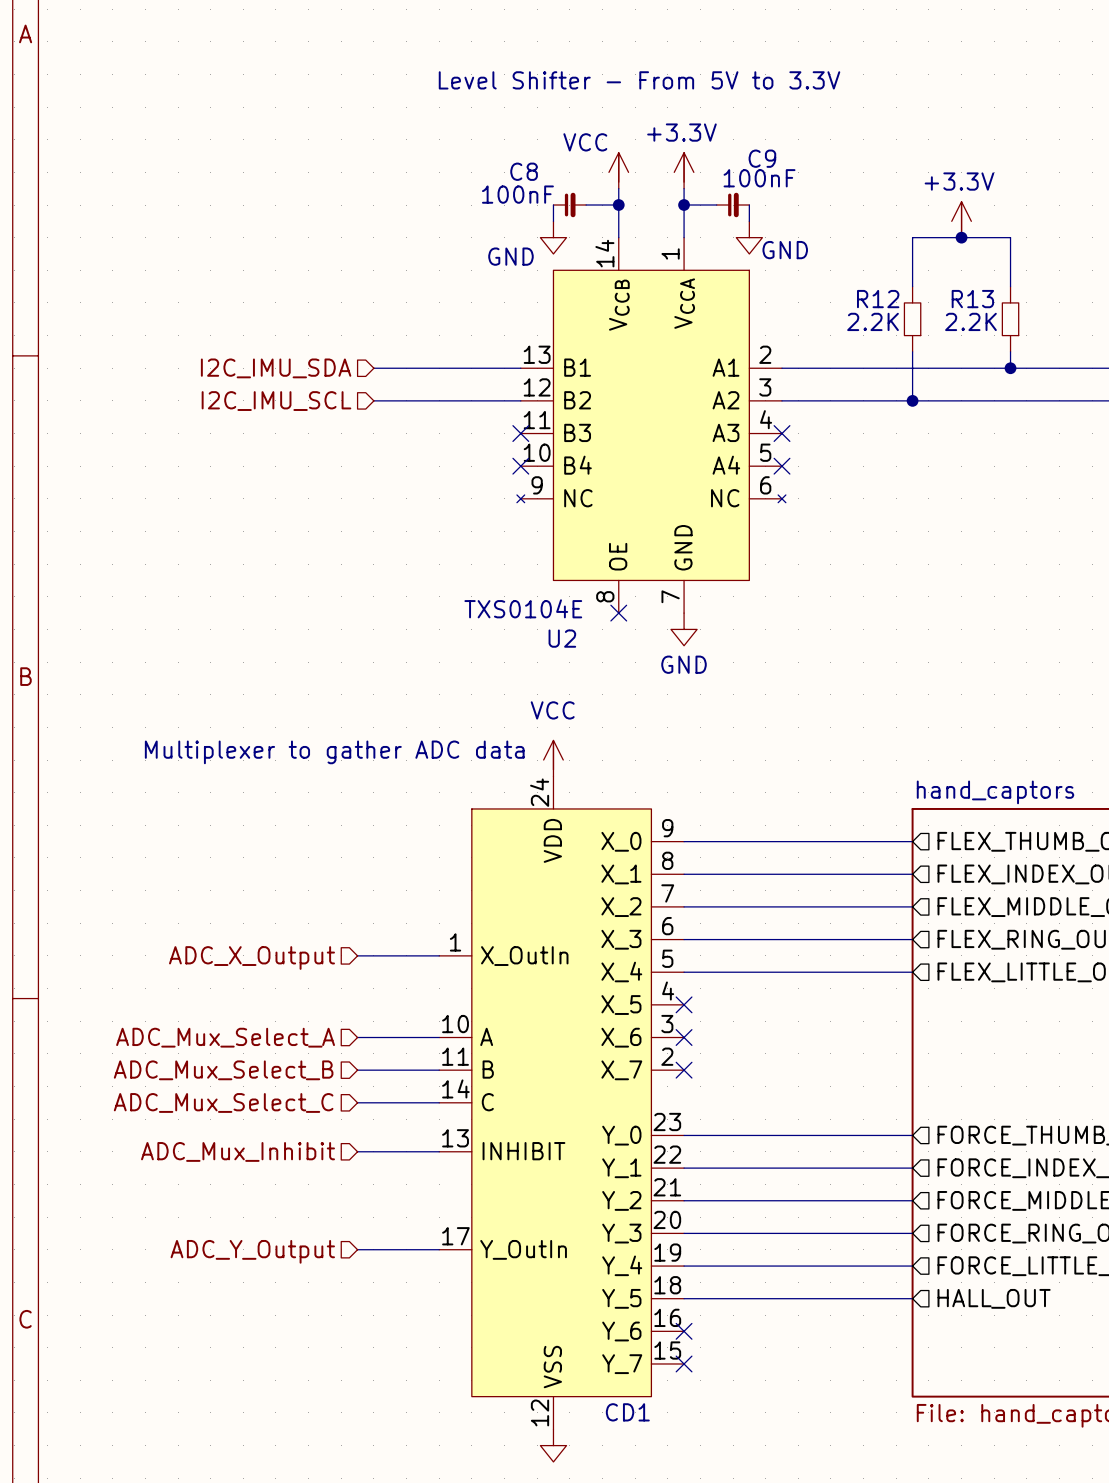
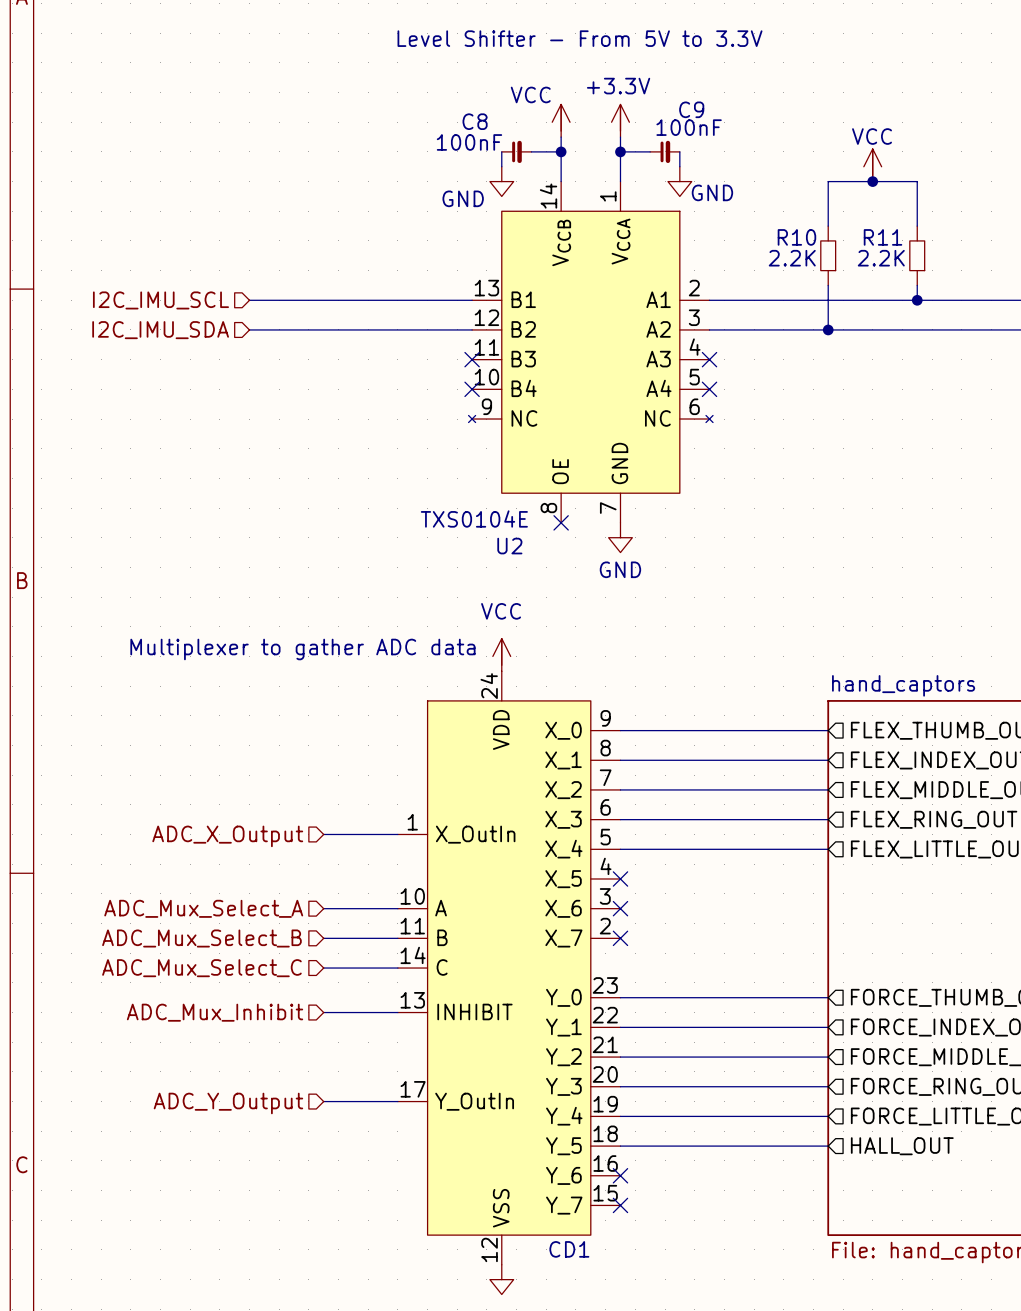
power symbol: +3.3V (961, 219) -> VCC (872, 165)
R12 name: R12 (878, 299) -> R10 (796, 237)
R13 name: R13 (972, 299) -> R11 (883, 237)
wire: none -> (249, 300) (338, 300)
hierarchical label position: I2C_IMU_SDA (276, 368) -> I2C_IMU_SDA (160, 330)
wire: none -> (249, 329) (338, 329)
hierarchical label position: I2C_IMU_SCL (276, 401) -> I2C_IMU_SCL (160, 300)

